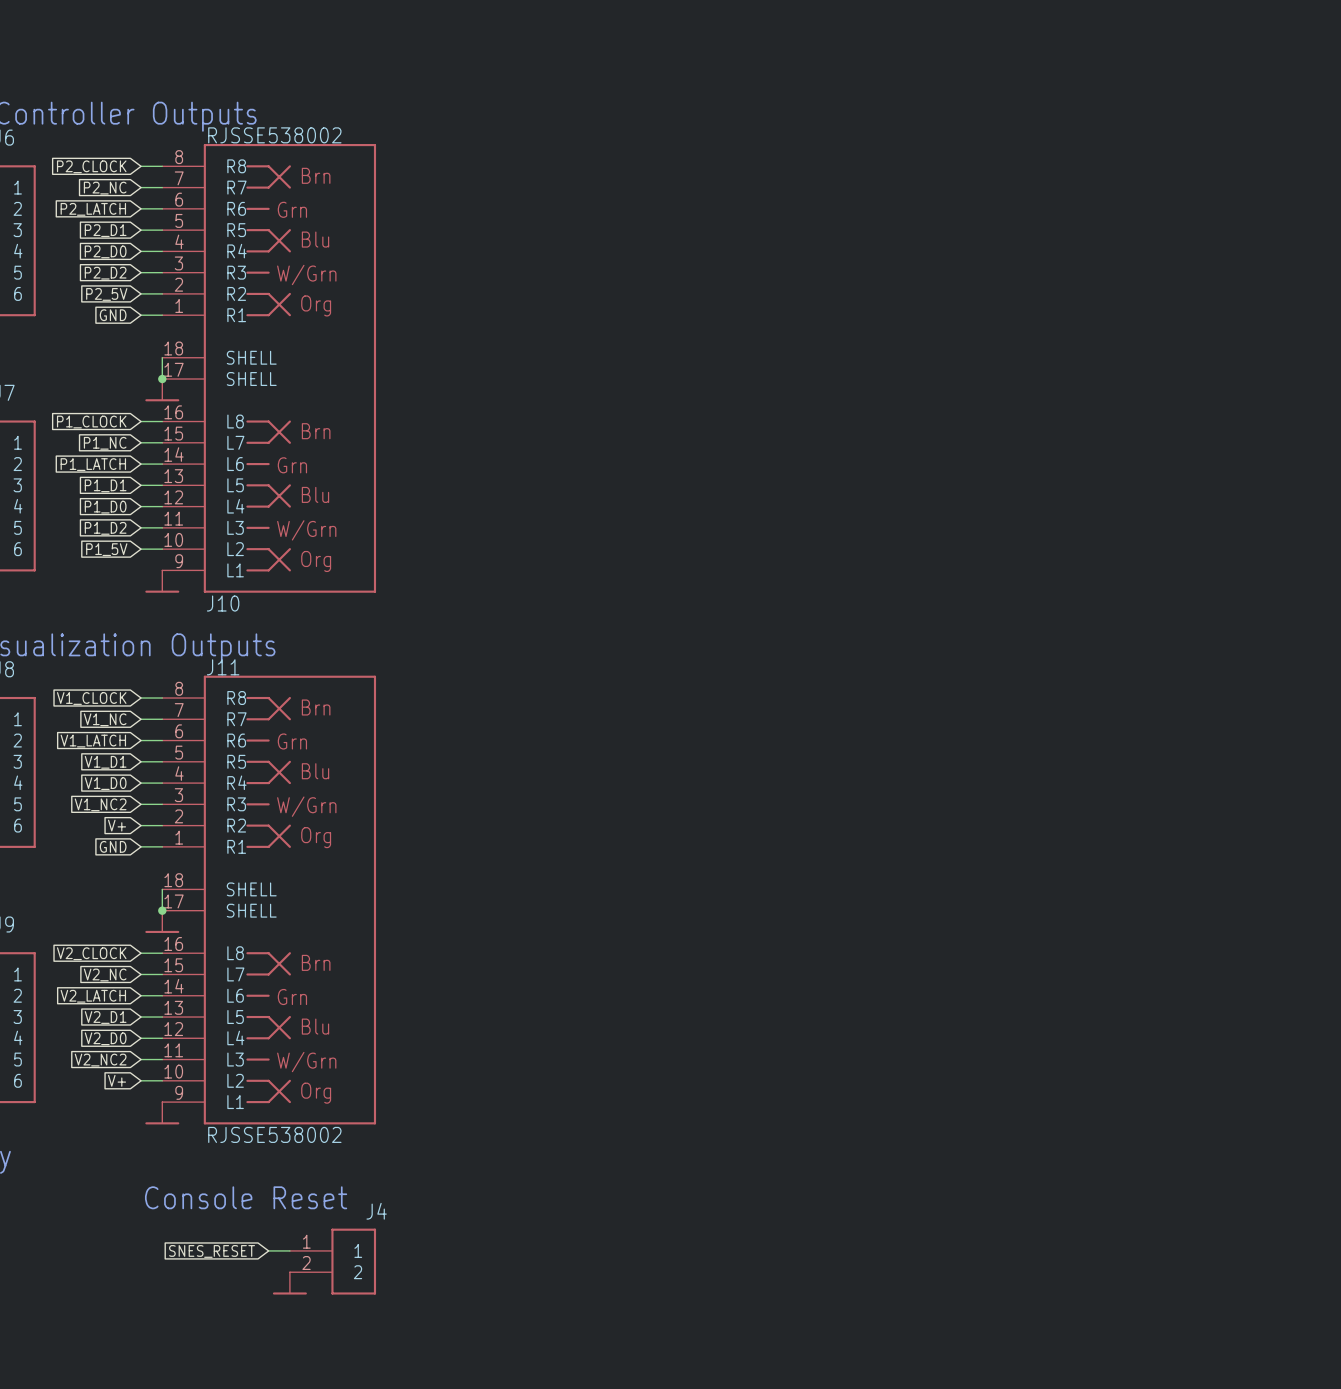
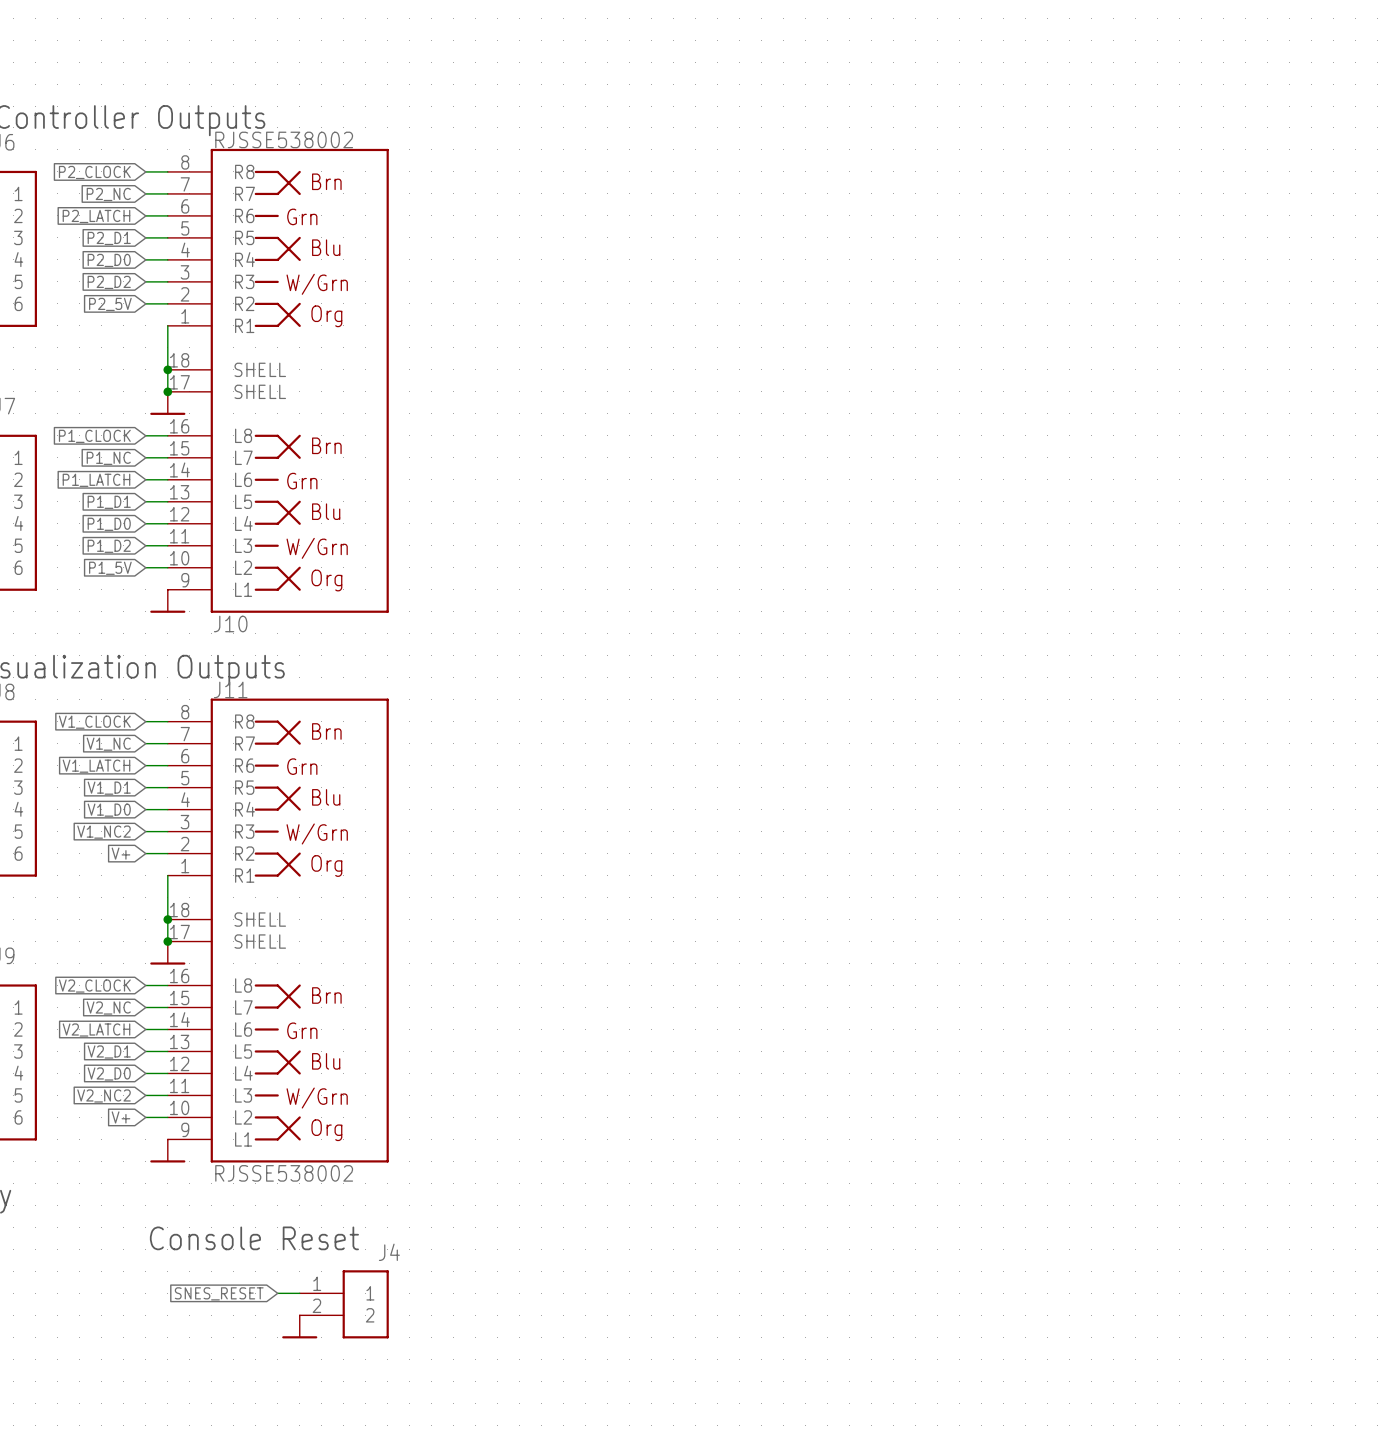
global label: GND (113, 315) -> none
wire: (141, 315) (162, 315) -> (167, 369) (167, 325)
junction: none -> (167, 369)
global label: GND (113, 846) -> none
wire: (141, 846) (162, 846) -> (167, 919) (167, 875)
junction: none -> (167, 919)

